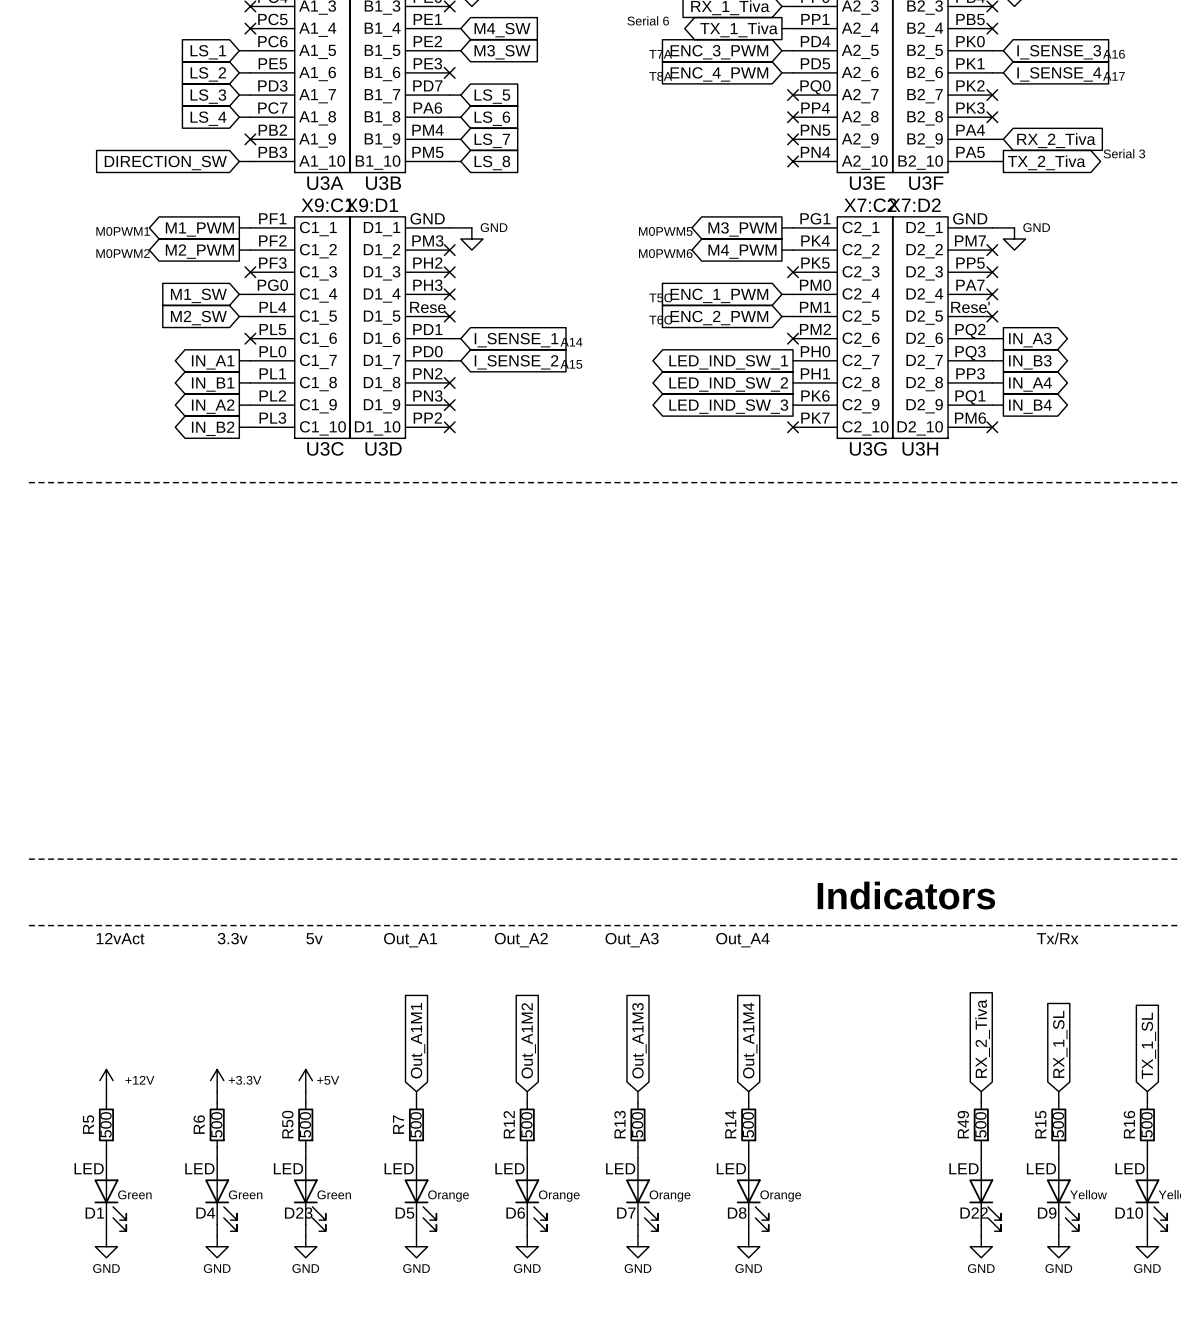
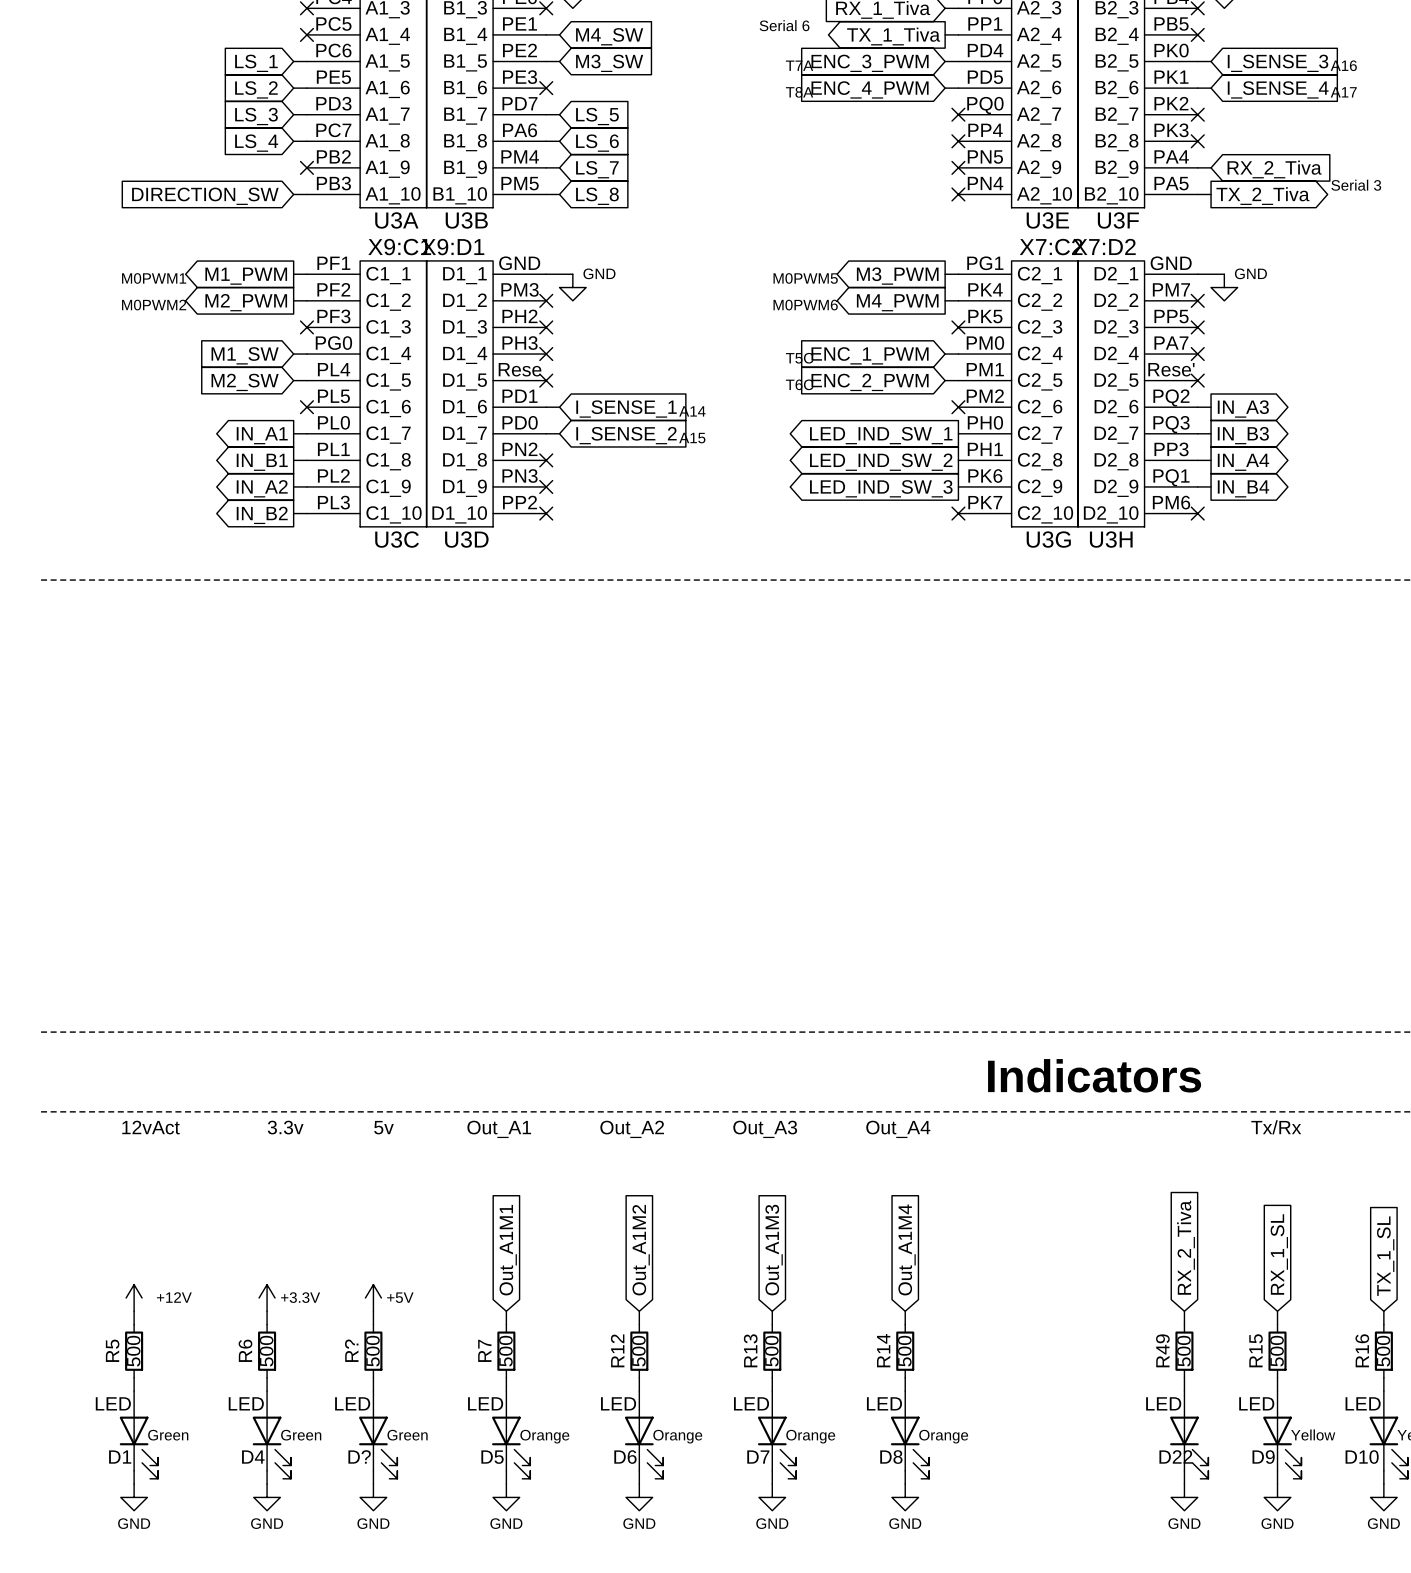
R50 name: R50 (287, 1124) -> R? (351, 1350)
D23 name: D23 (298, 1213) -> D? (359, 1456)

